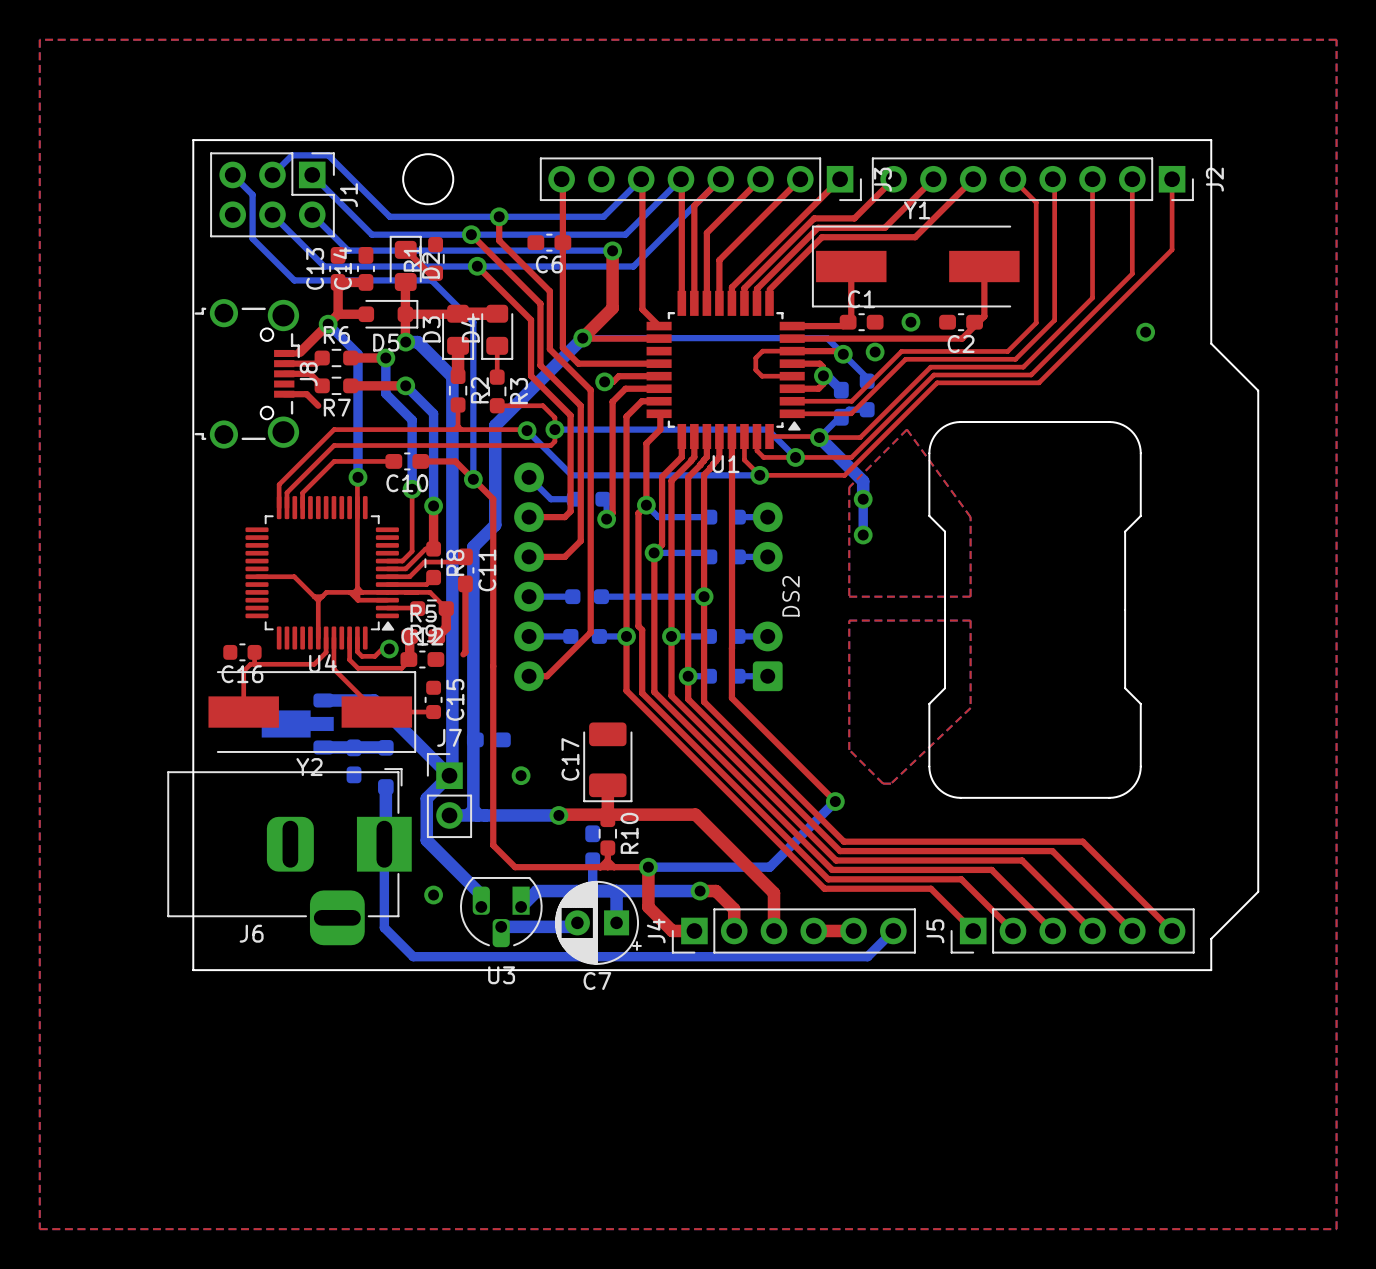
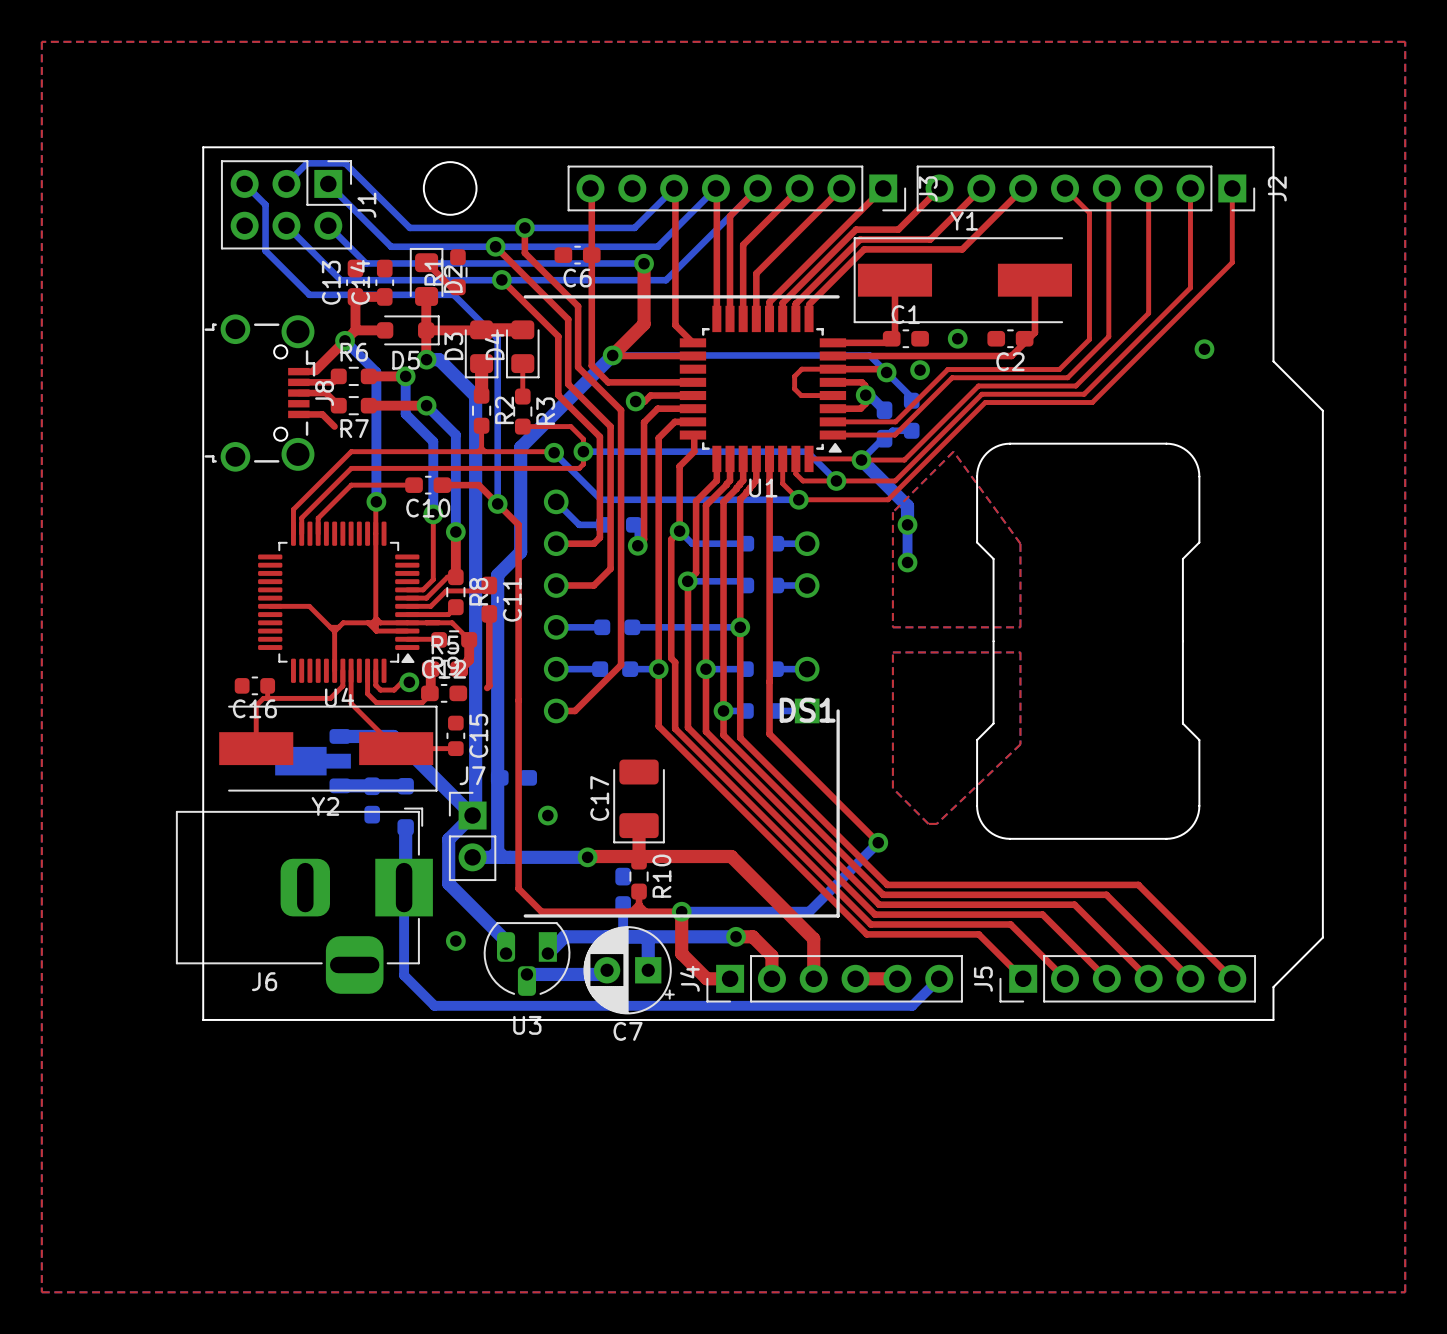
DS2: (648, 576) -> none
DS1: none -> (681, 606)

